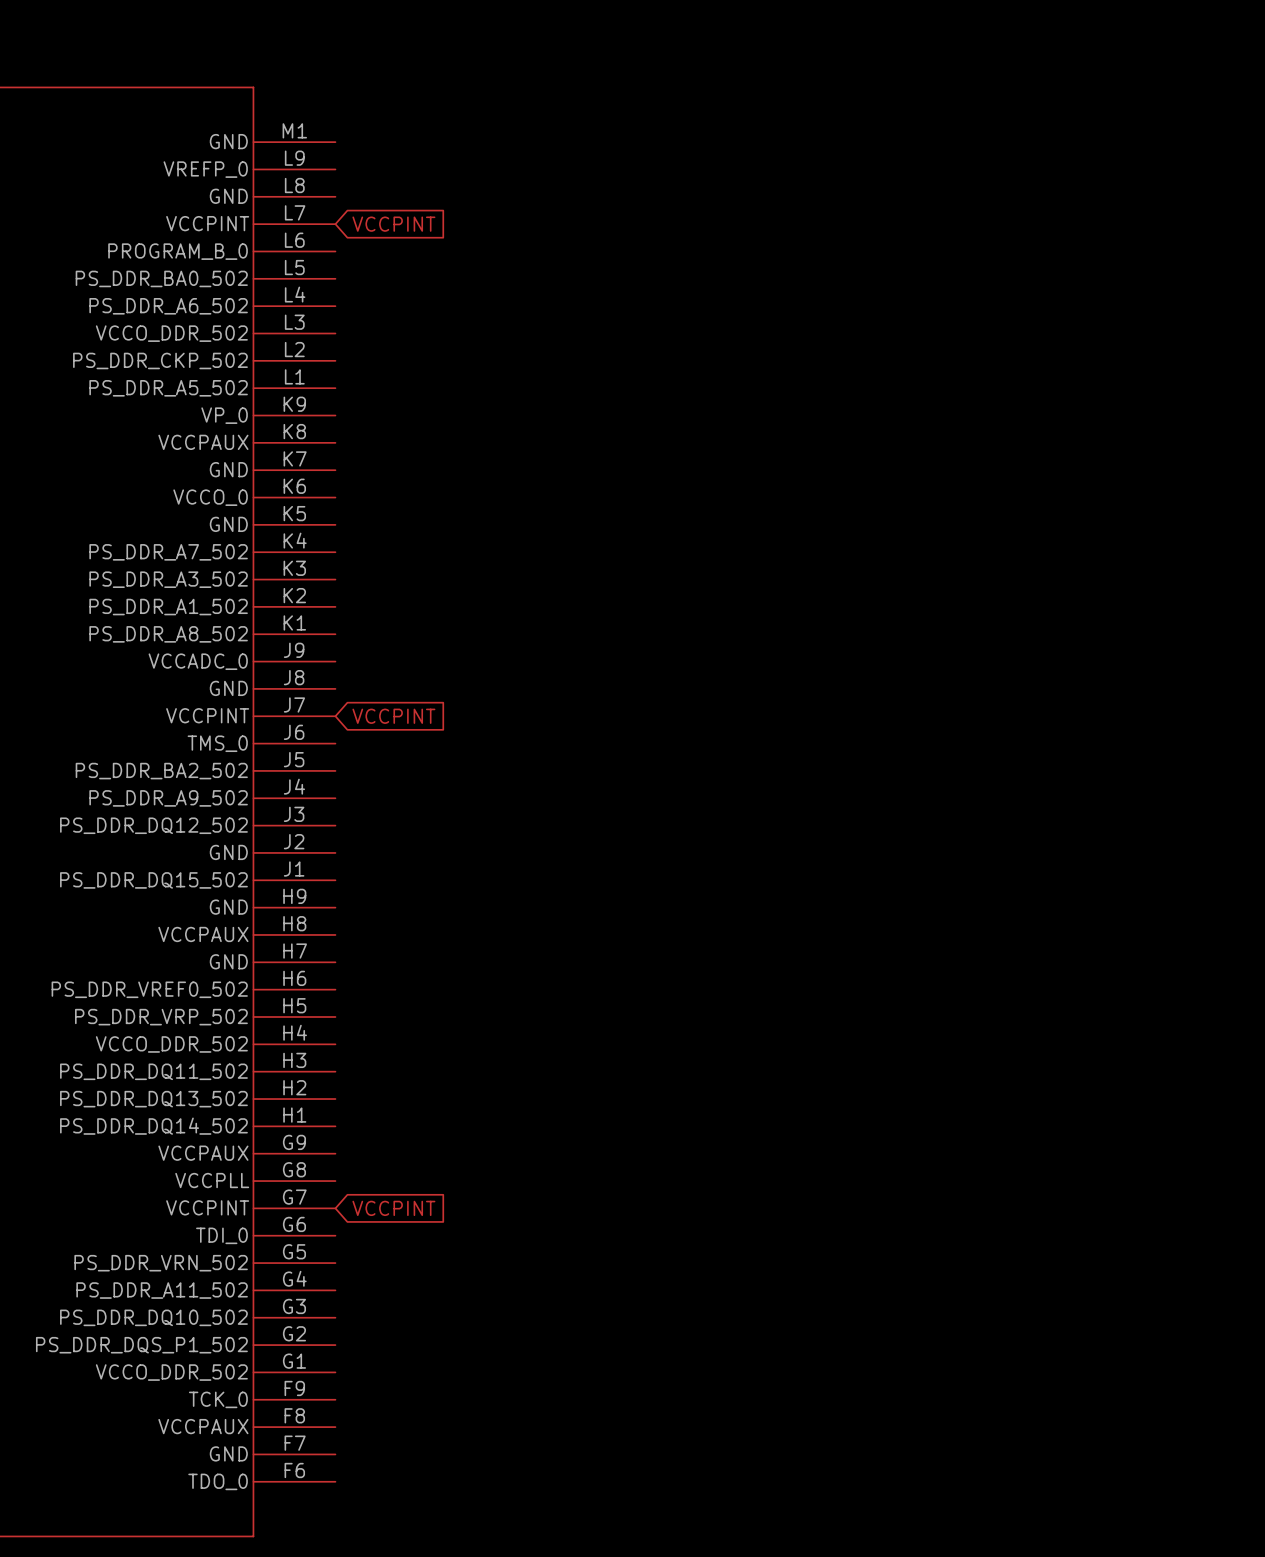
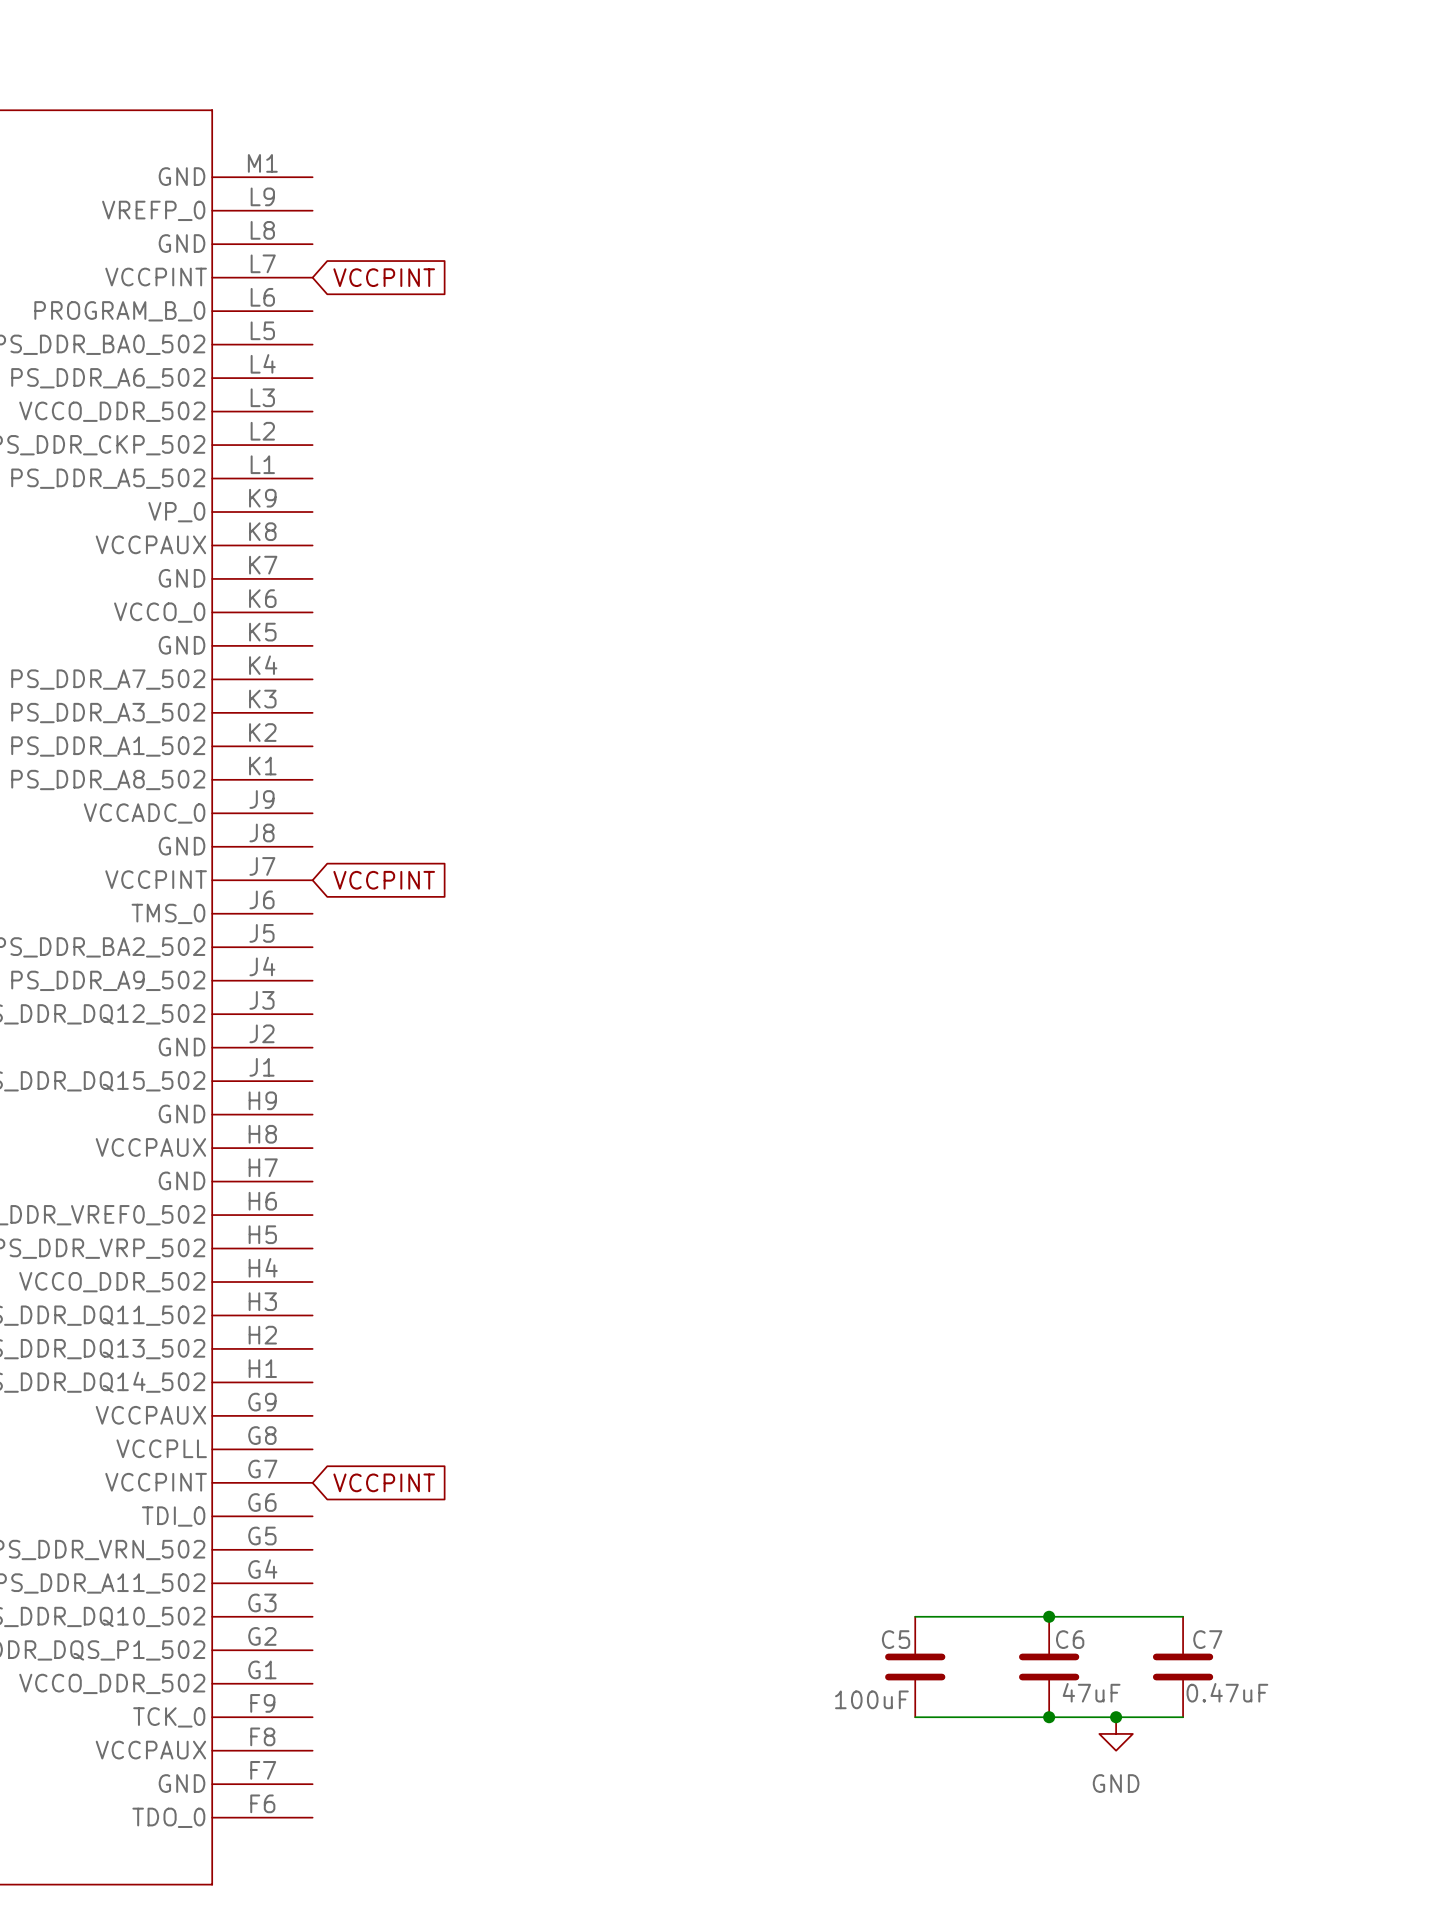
wire: none -> (915, 1616) (1183, 1616)
junction: none -> (1049, 1616)
C5: none -> 100uF (915, 1667)
C6: none -> 47uF (1049, 1667)
C7: none -> 0.47uF (1183, 1667)
wire: none -> (915, 1717) (1183, 1717)
junction: none -> (1049, 1717)
junction: none -> (1116, 1717)
power symbol: none -> GND (1116, 1733)

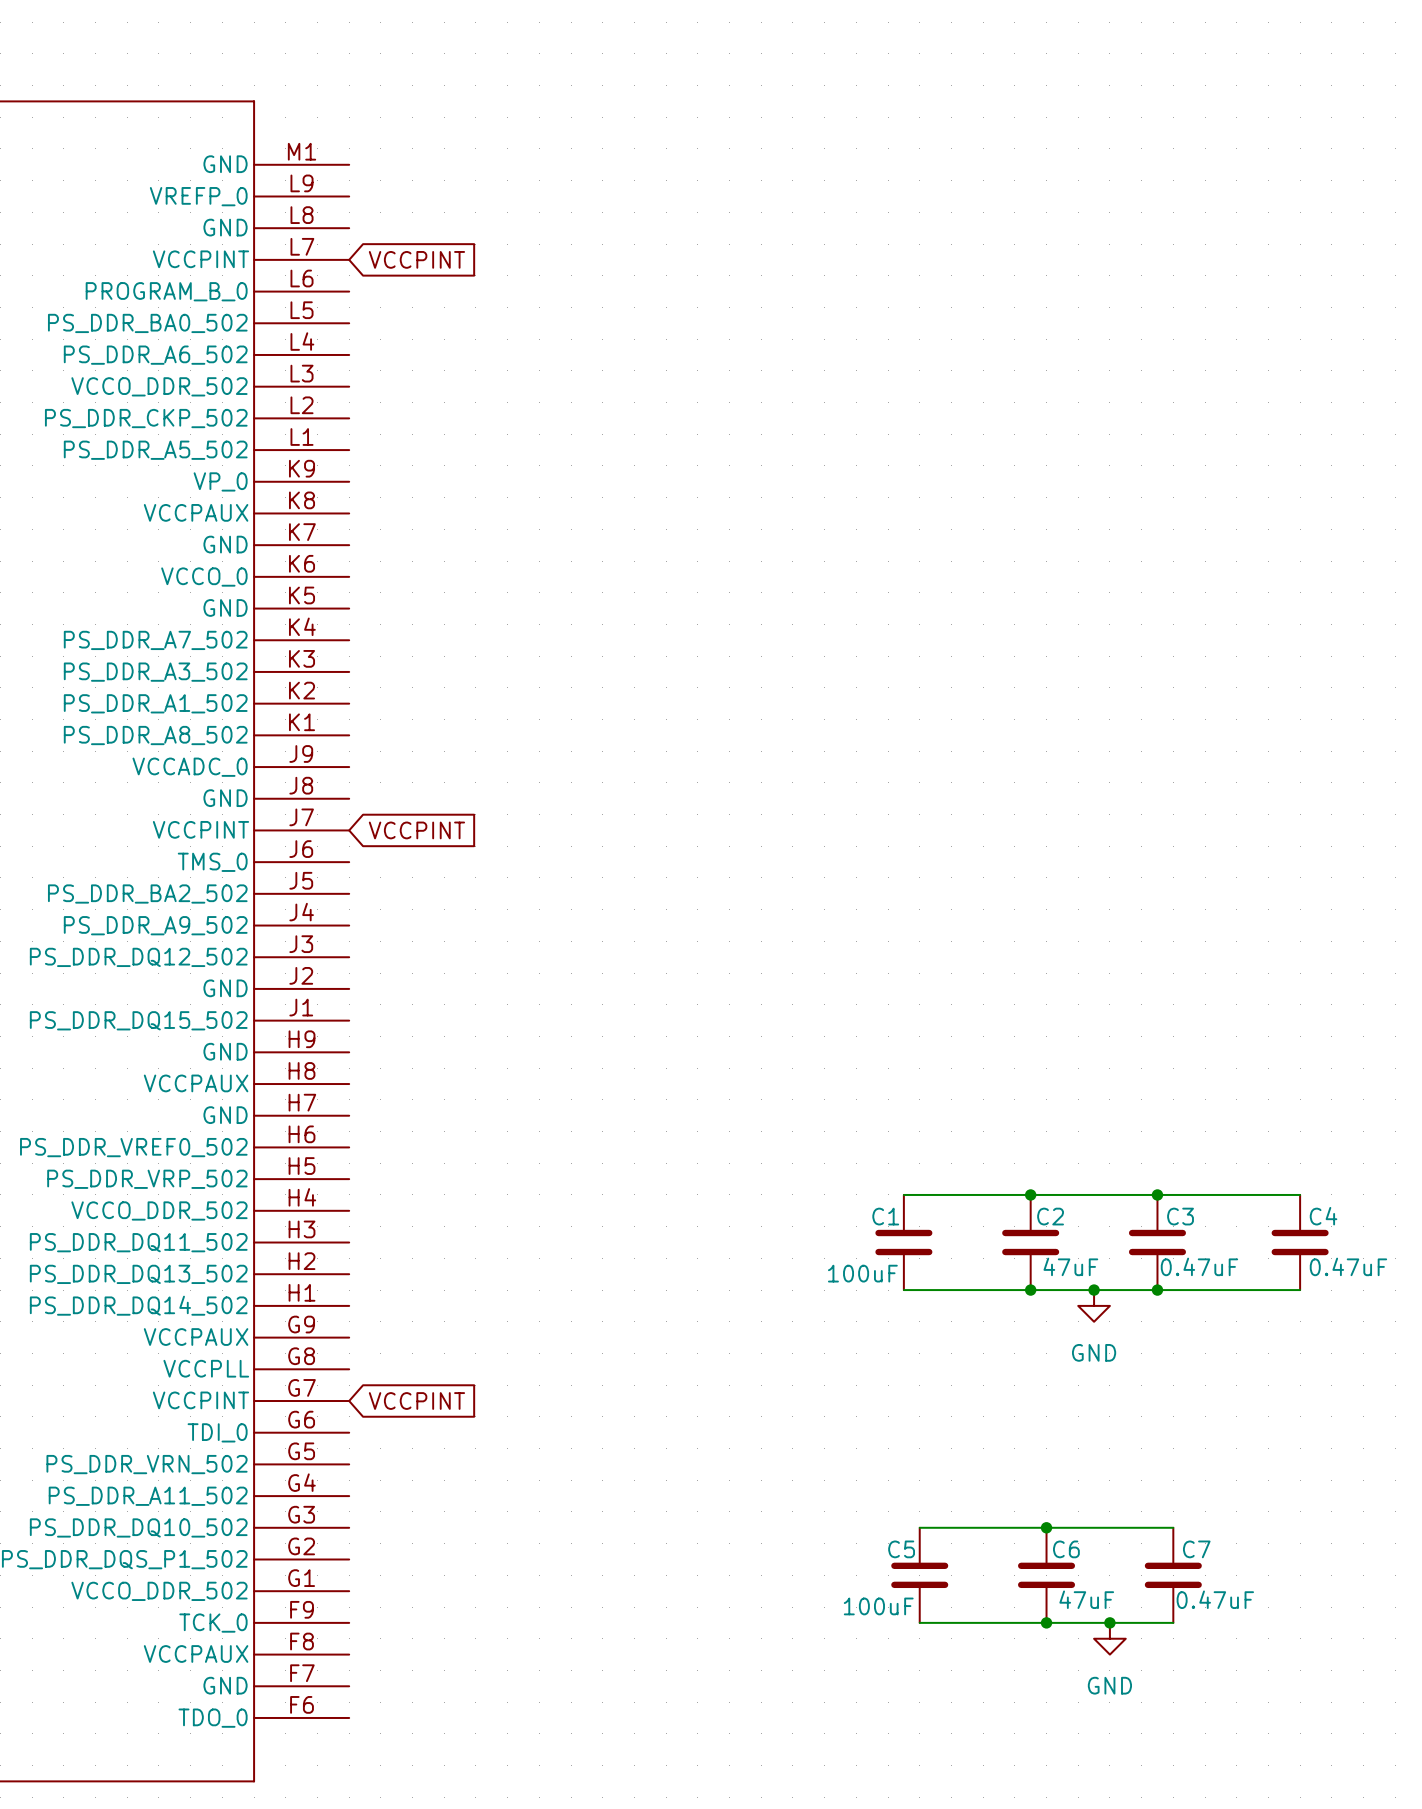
wire: none -> (903, 1194) (1300, 1194)
junction: none -> (1030, 1194)
junction: none -> (1157, 1194)
C1: none -> 100uF (903, 1242)
C2: none -> 47uF (1030, 1242)
C3: none -> 0.47uF (1157, 1242)
C4: none -> 0.47uF (1300, 1242)
wire: none -> (903, 1290) (1300, 1290)
junction: none -> (1030, 1290)
junction: none -> (1094, 1290)
junction: none -> (1157, 1290)
power symbol: none -> GND (1094, 1305)

